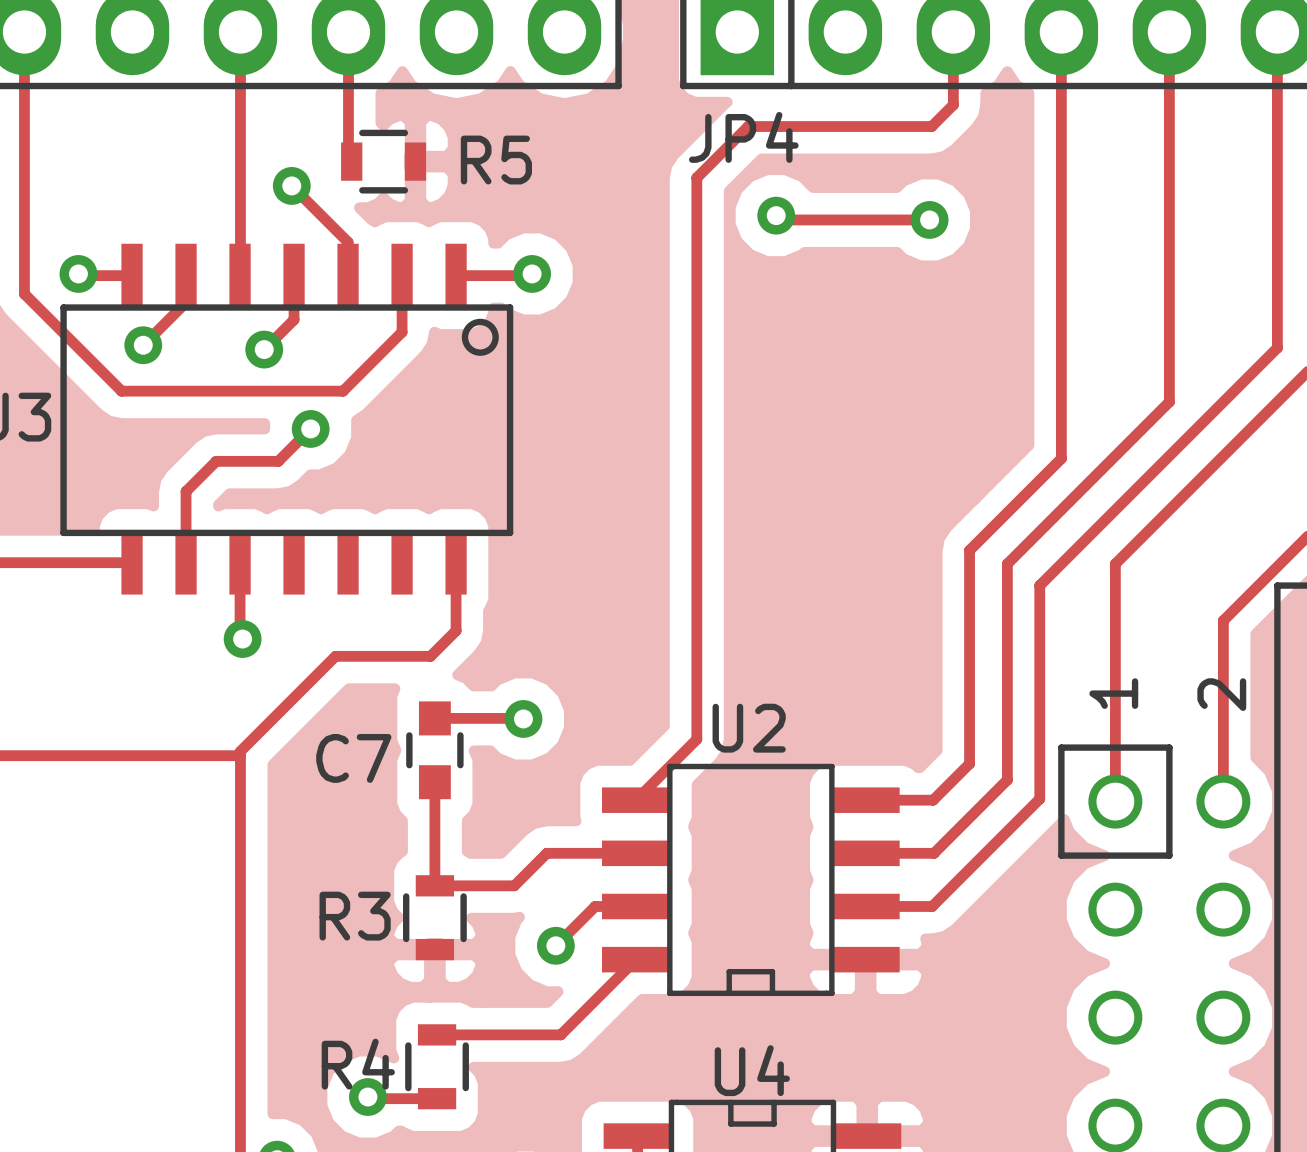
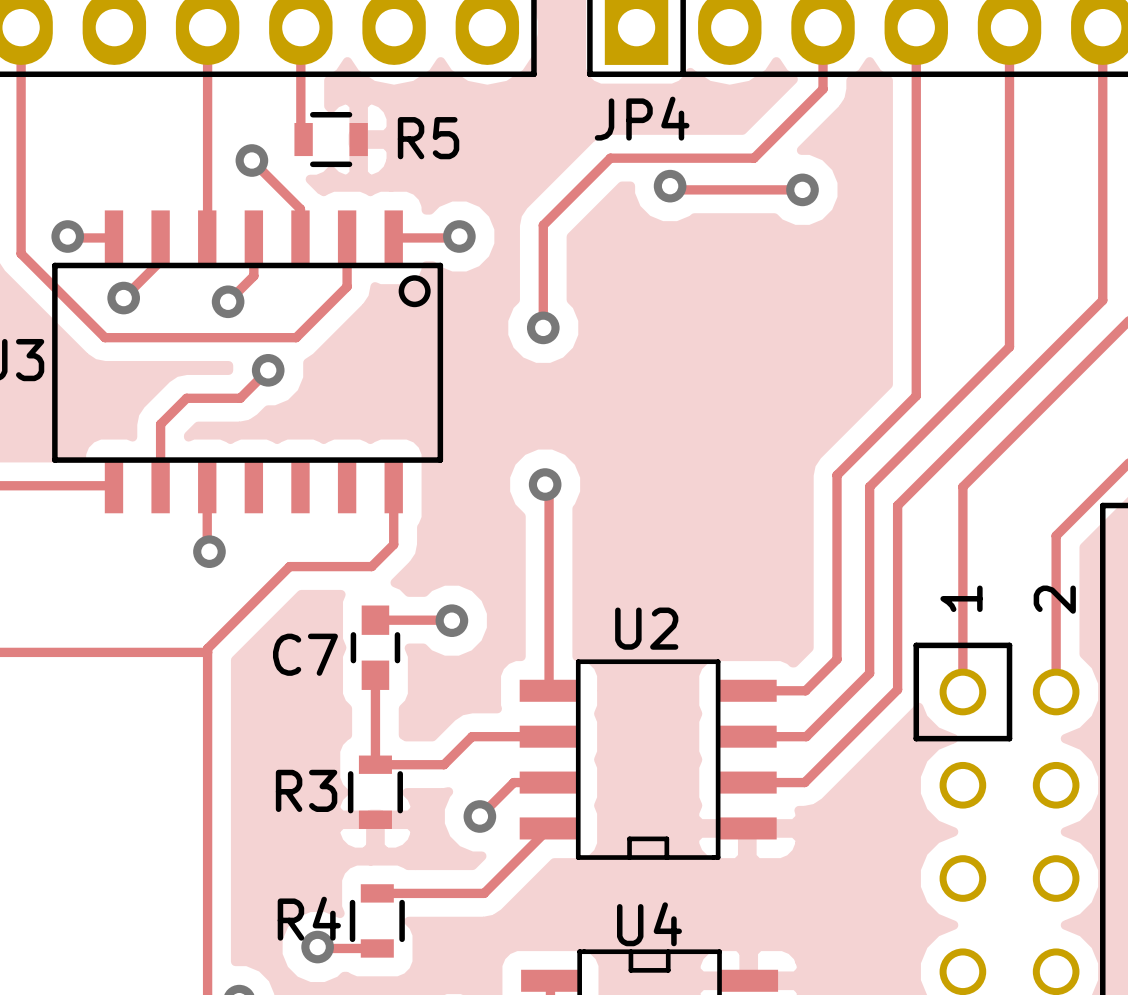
track: (953, 103) (931, 126) (748, 126) (696, 177) (696, 739) (636, 800) -> (823, 89) (754, 158) (610, 158) (543, 225) (543, 327)
via: none -> (543, 327)
track: none -> (545, 484) (549, 488) (549, 690) (573, 690)
via: none -> (545, 484)

